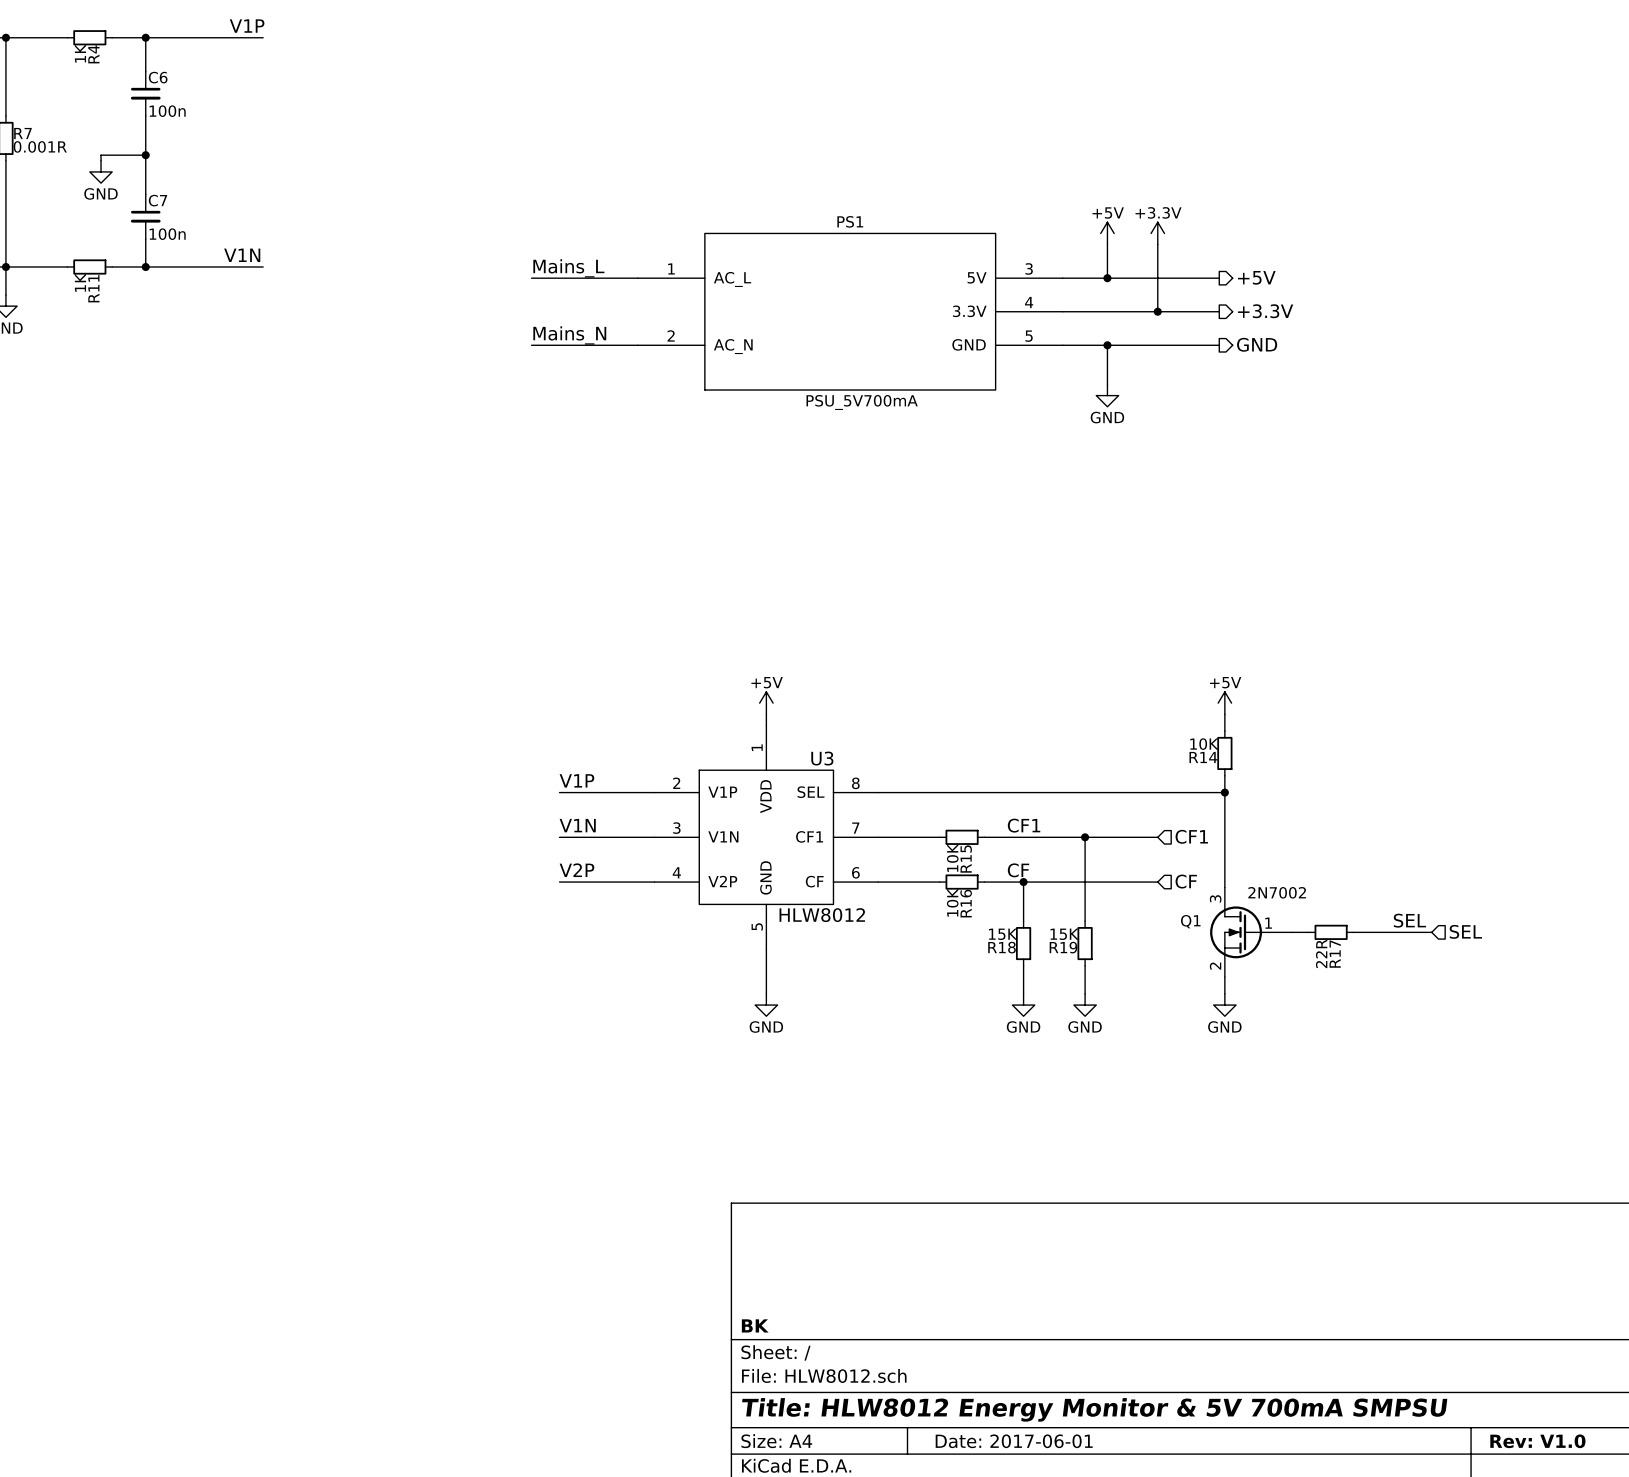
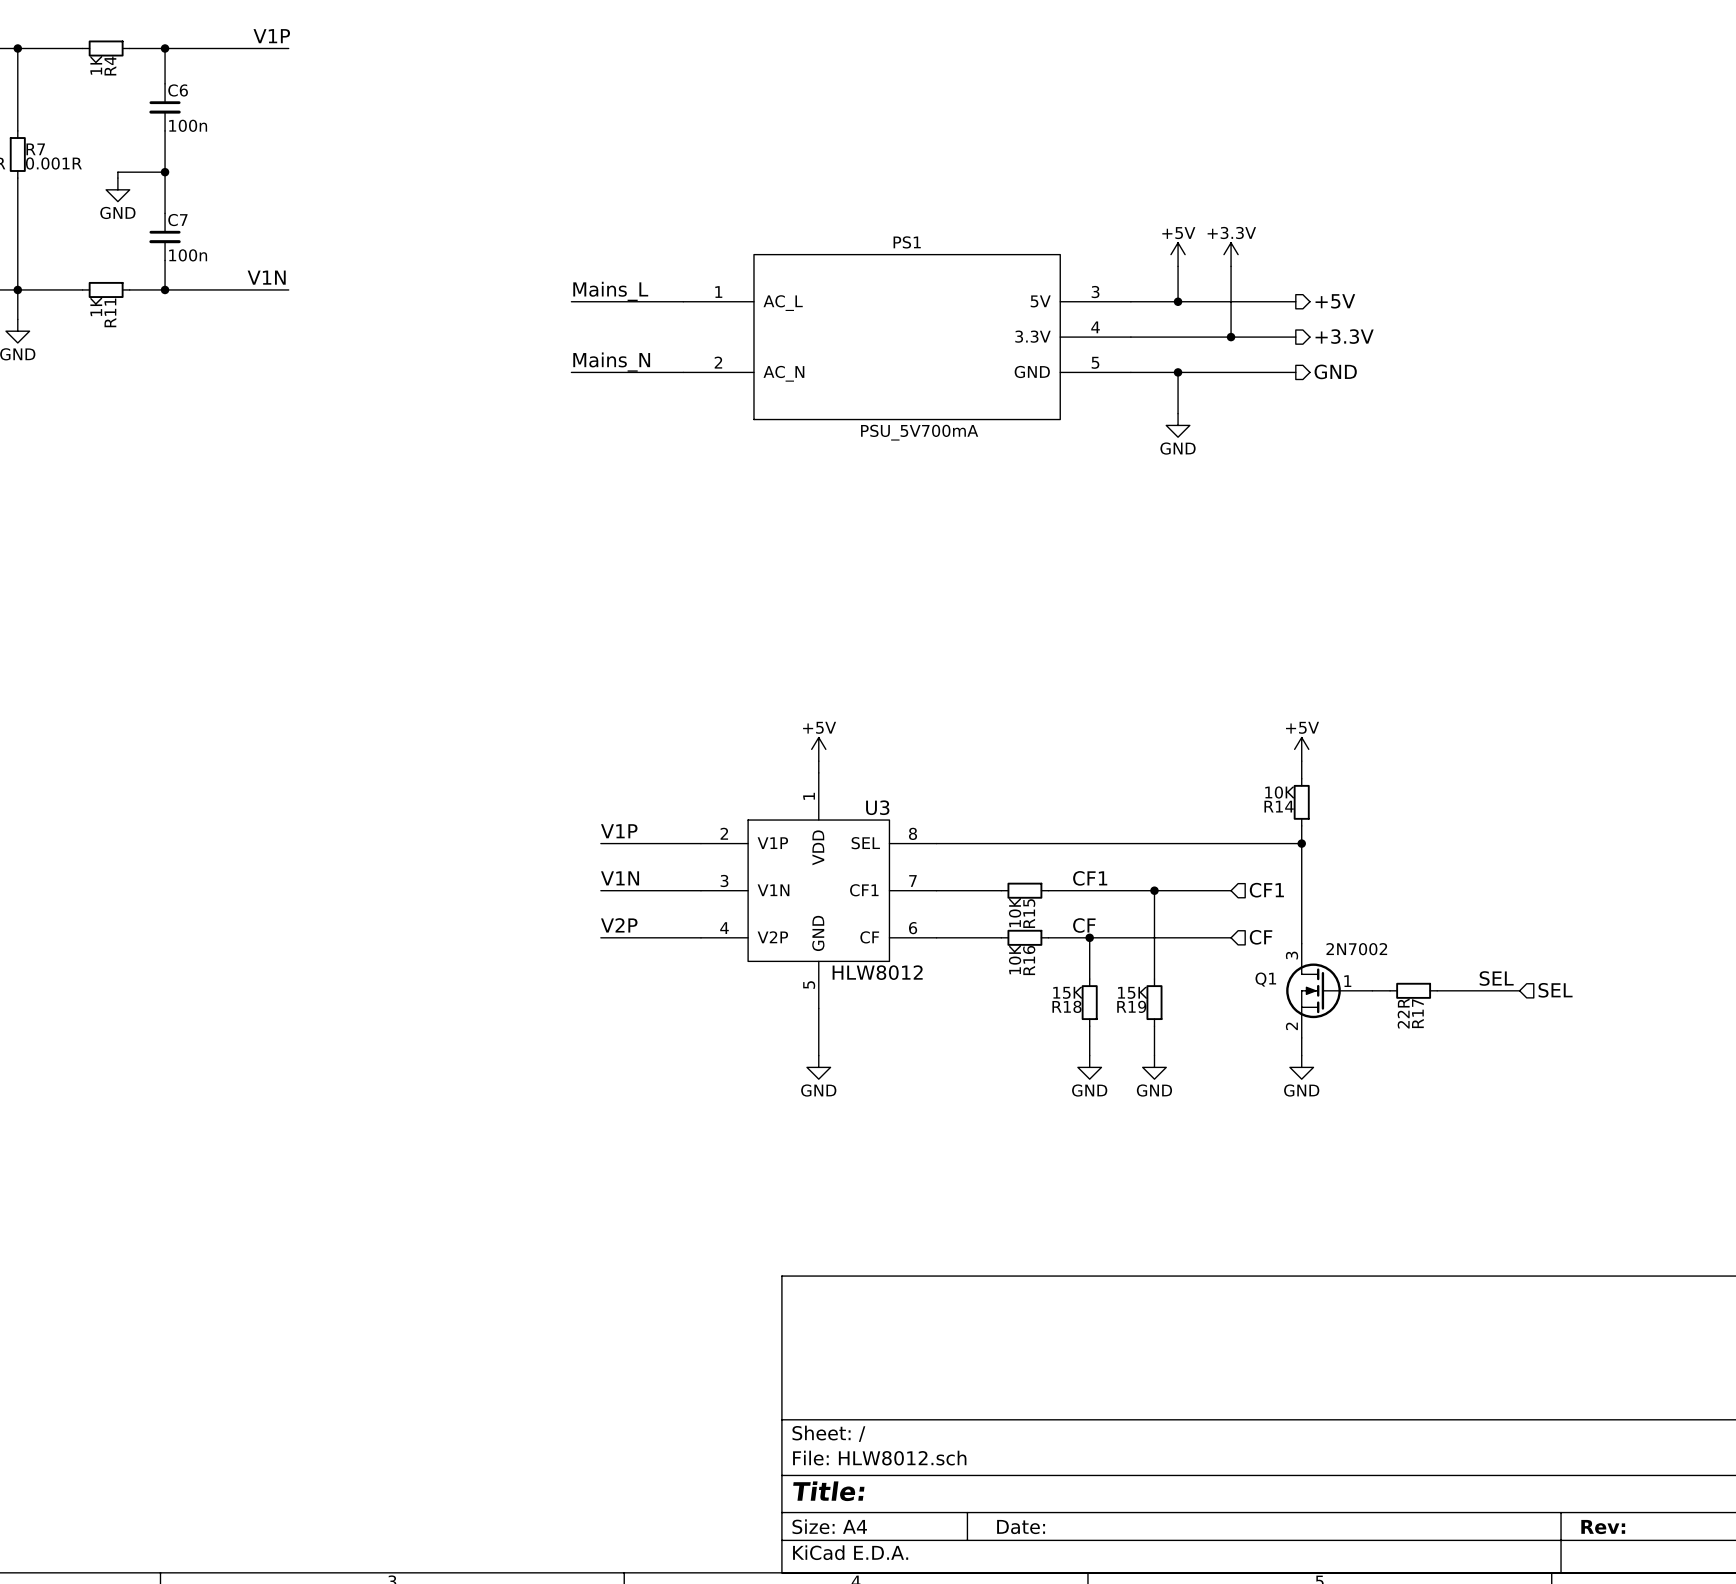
title block: BK (755, 1325) -> none
title block: Title: HLW8012 Energy Monitor & 5V 700mA SMPSU (1094, 1409) -> Title: (828, 1491)
title block: Date: 2017-06-01 (1014, 1441) -> Date: (1021, 1527)
title block: Rev: V1.0 (1537, 1441) -> Rev: (1603, 1527)

